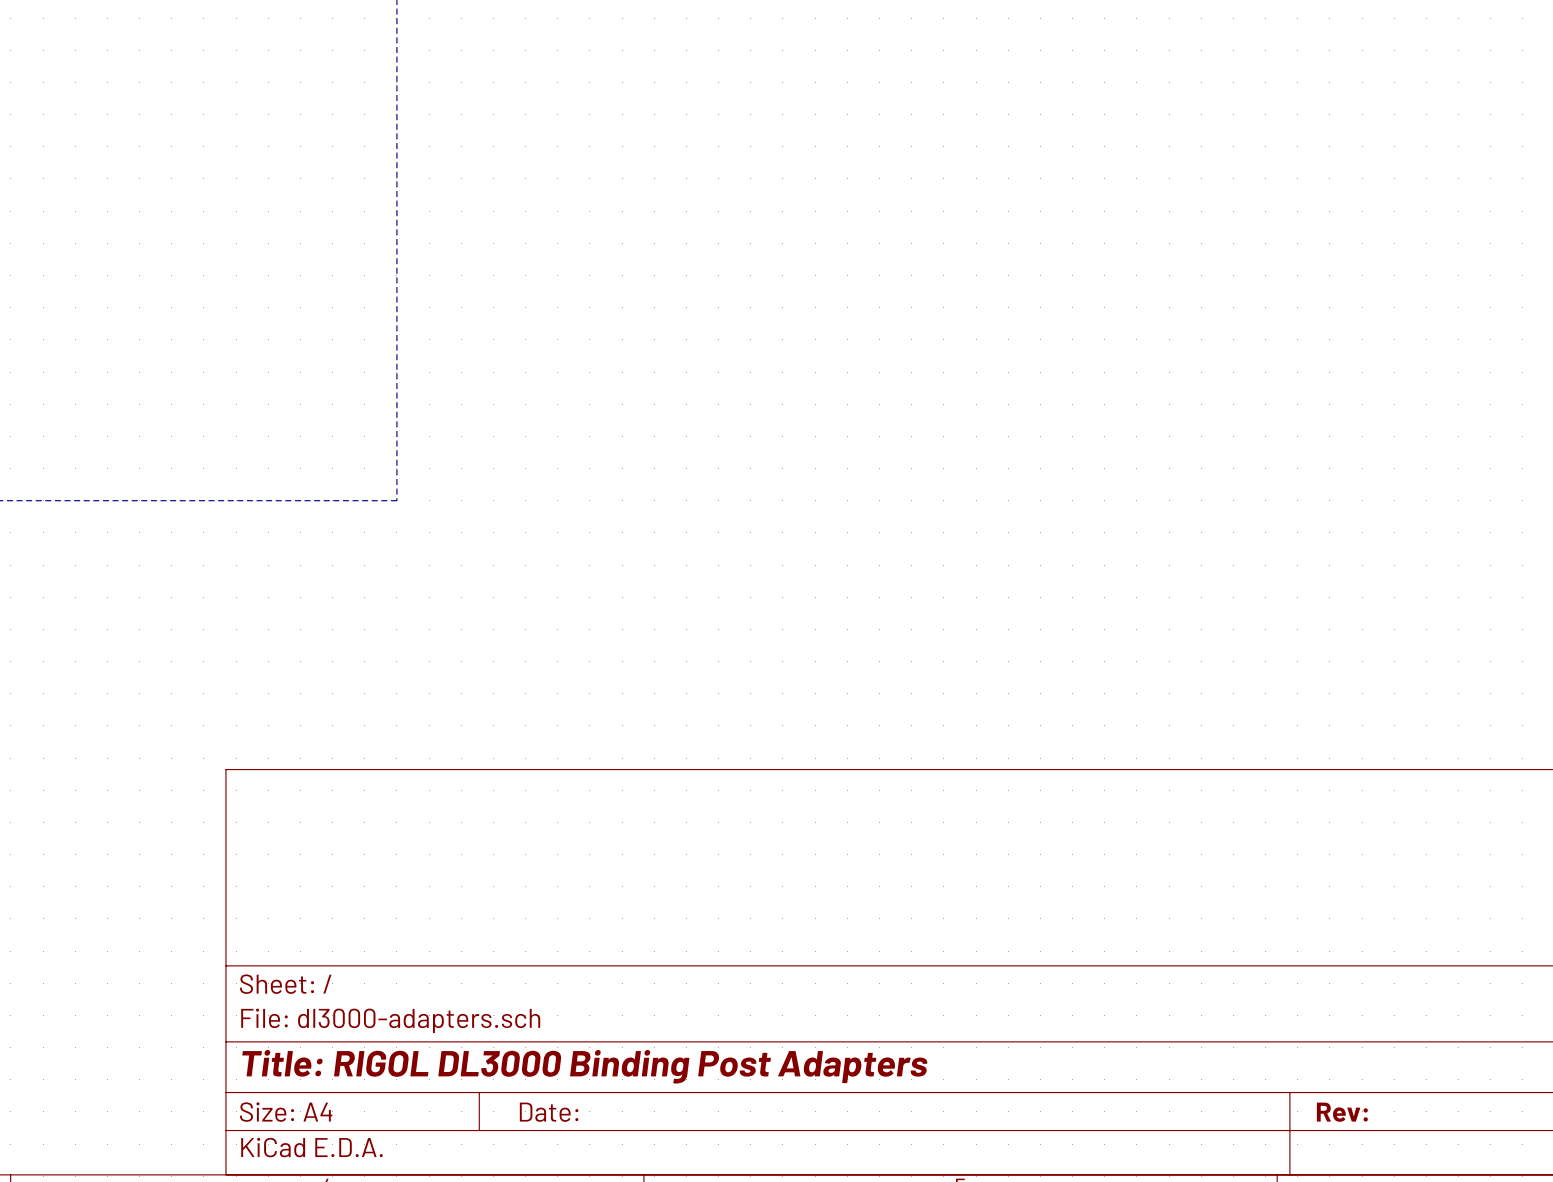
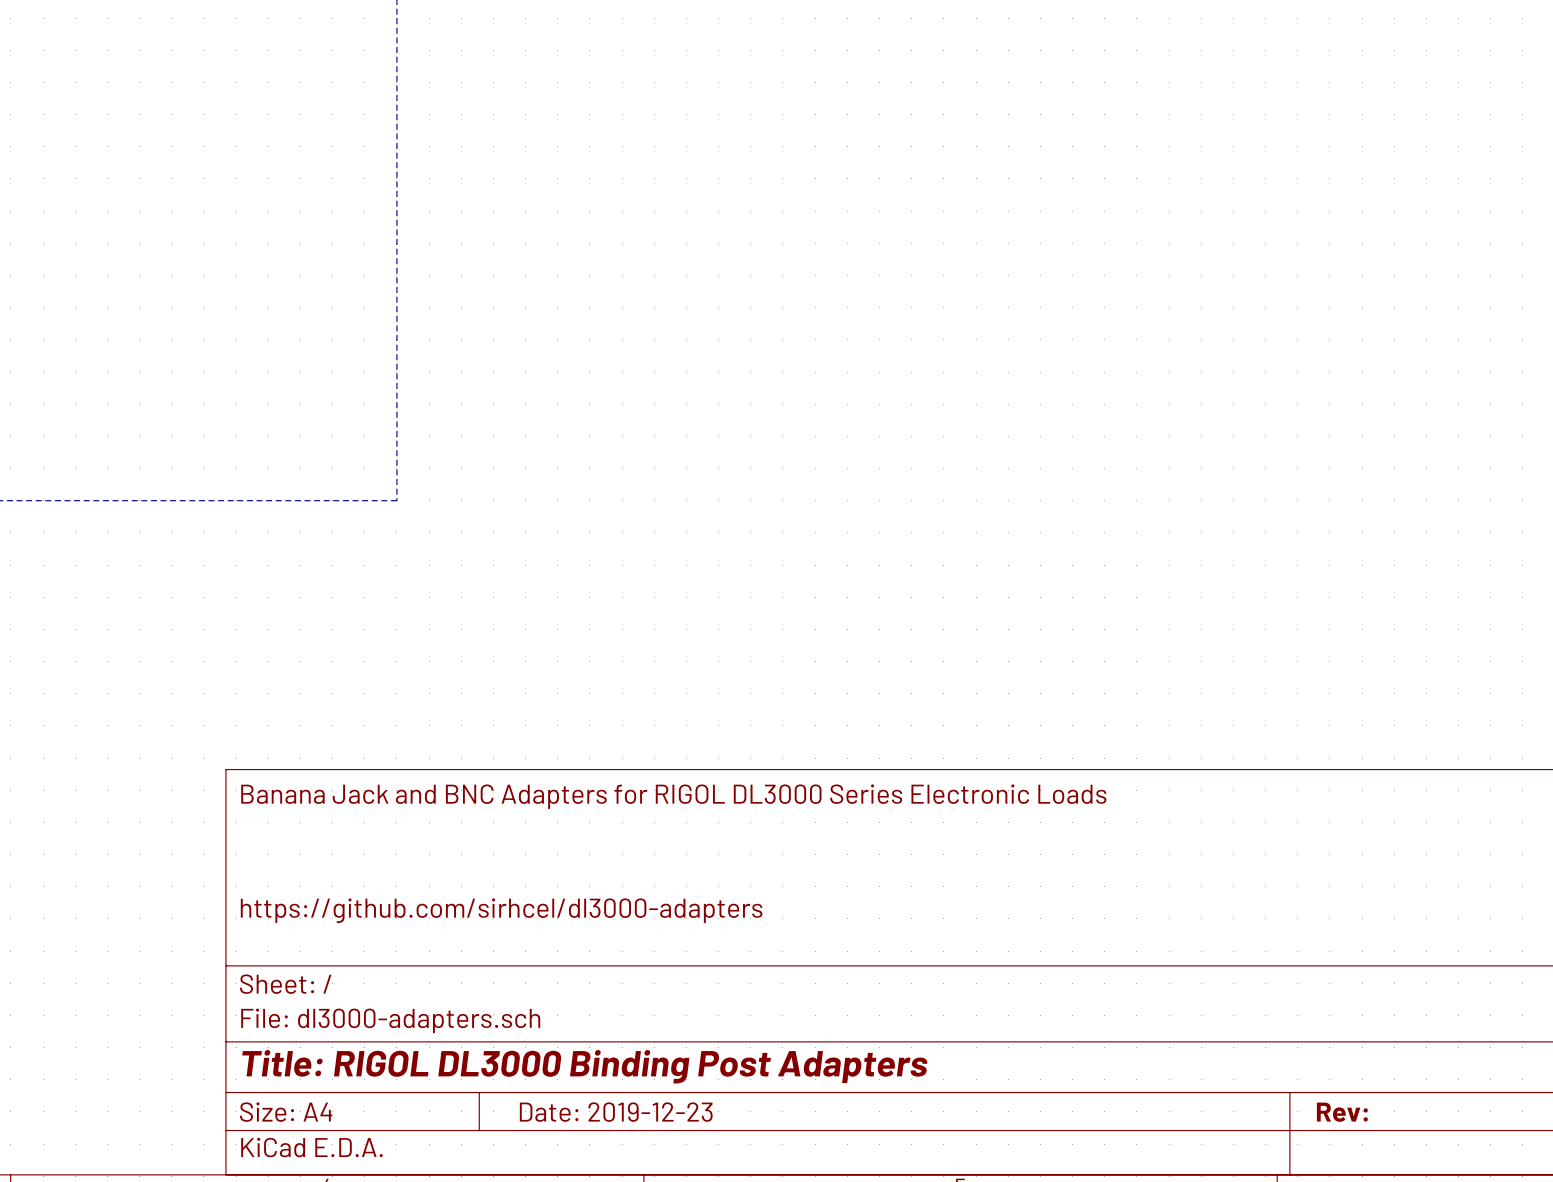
title block: none -> Banana Jack and BNC Adapters for RIGOL DL3000 Series Electronic Loads (673, 796)
title block: none -> https://github.com/sirhcel/dl3000-adapters (501, 910)
title block: Date: (549, 1112) -> Date: 2019-12-23 (616, 1112)

